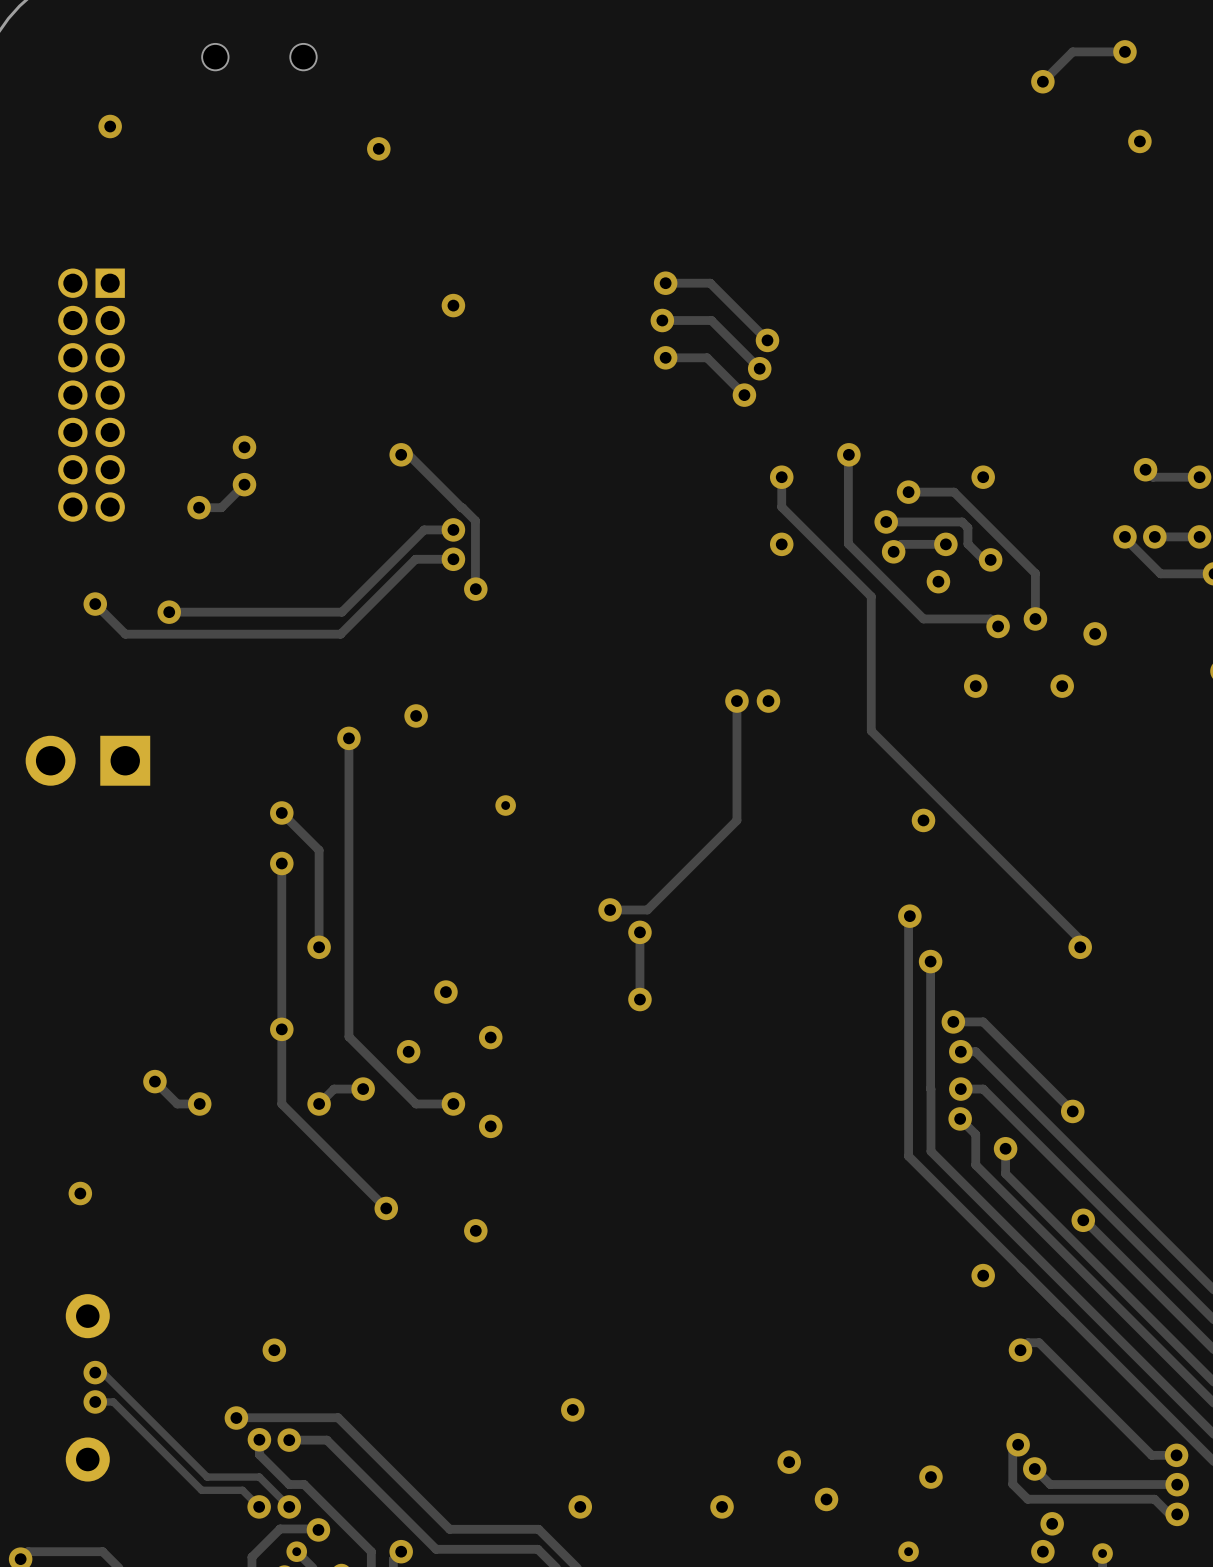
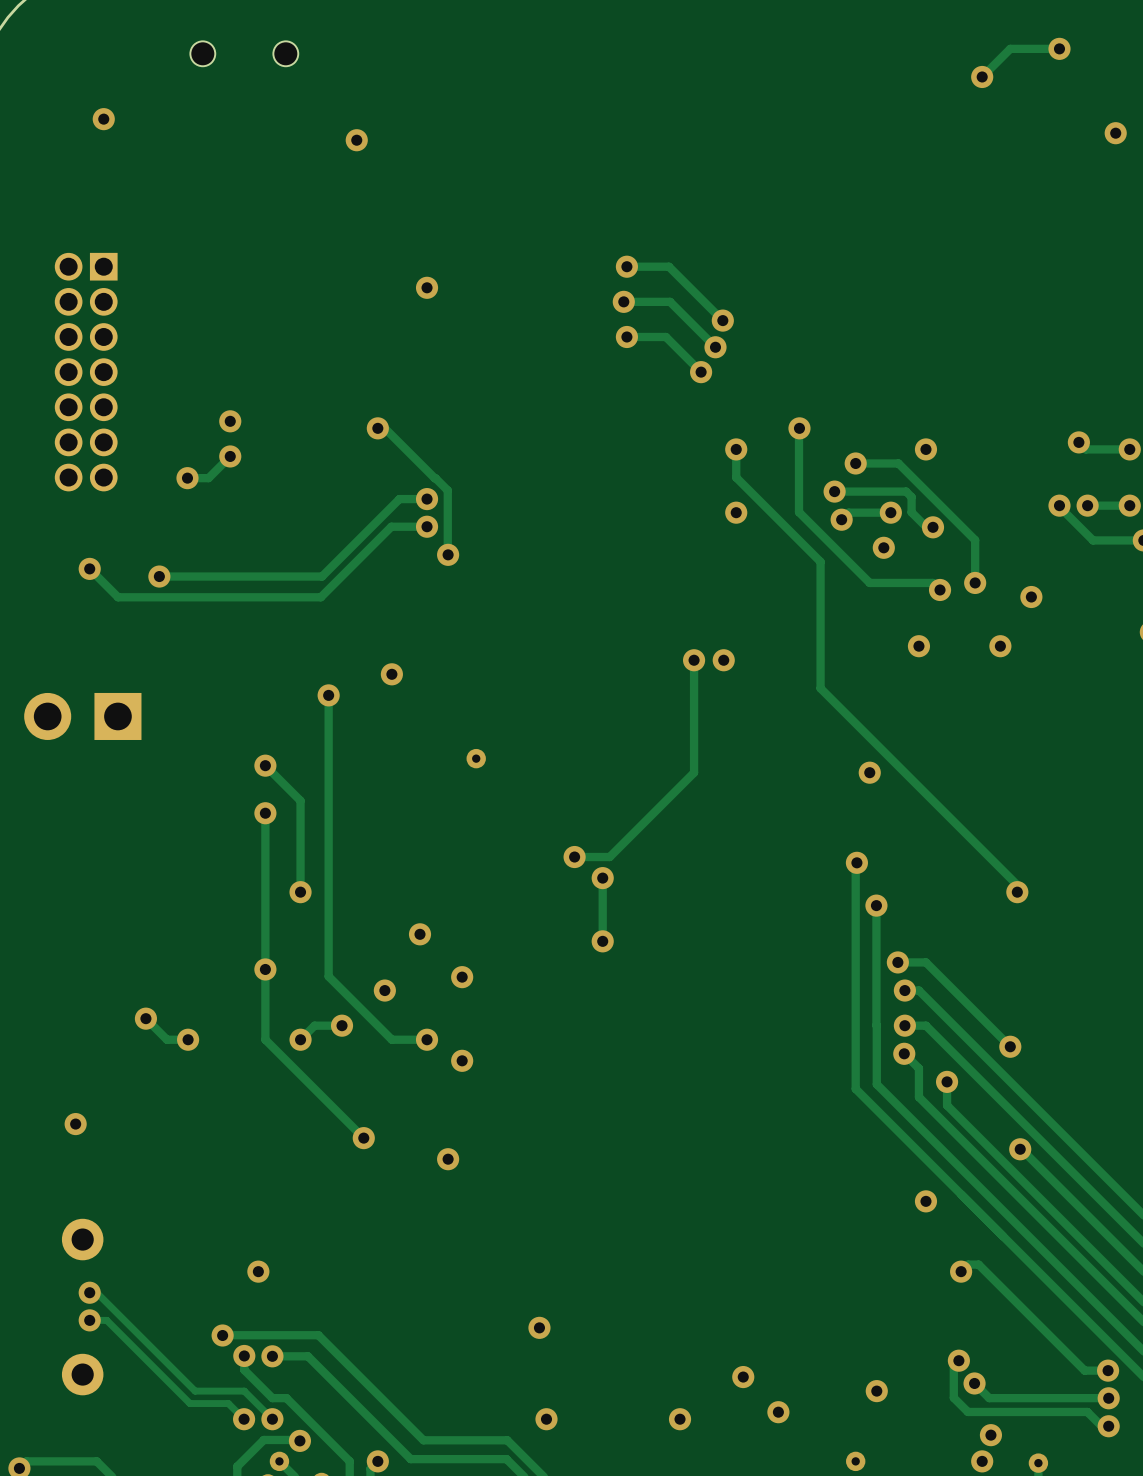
via position: (1139, 141) -> (1115, 133)

